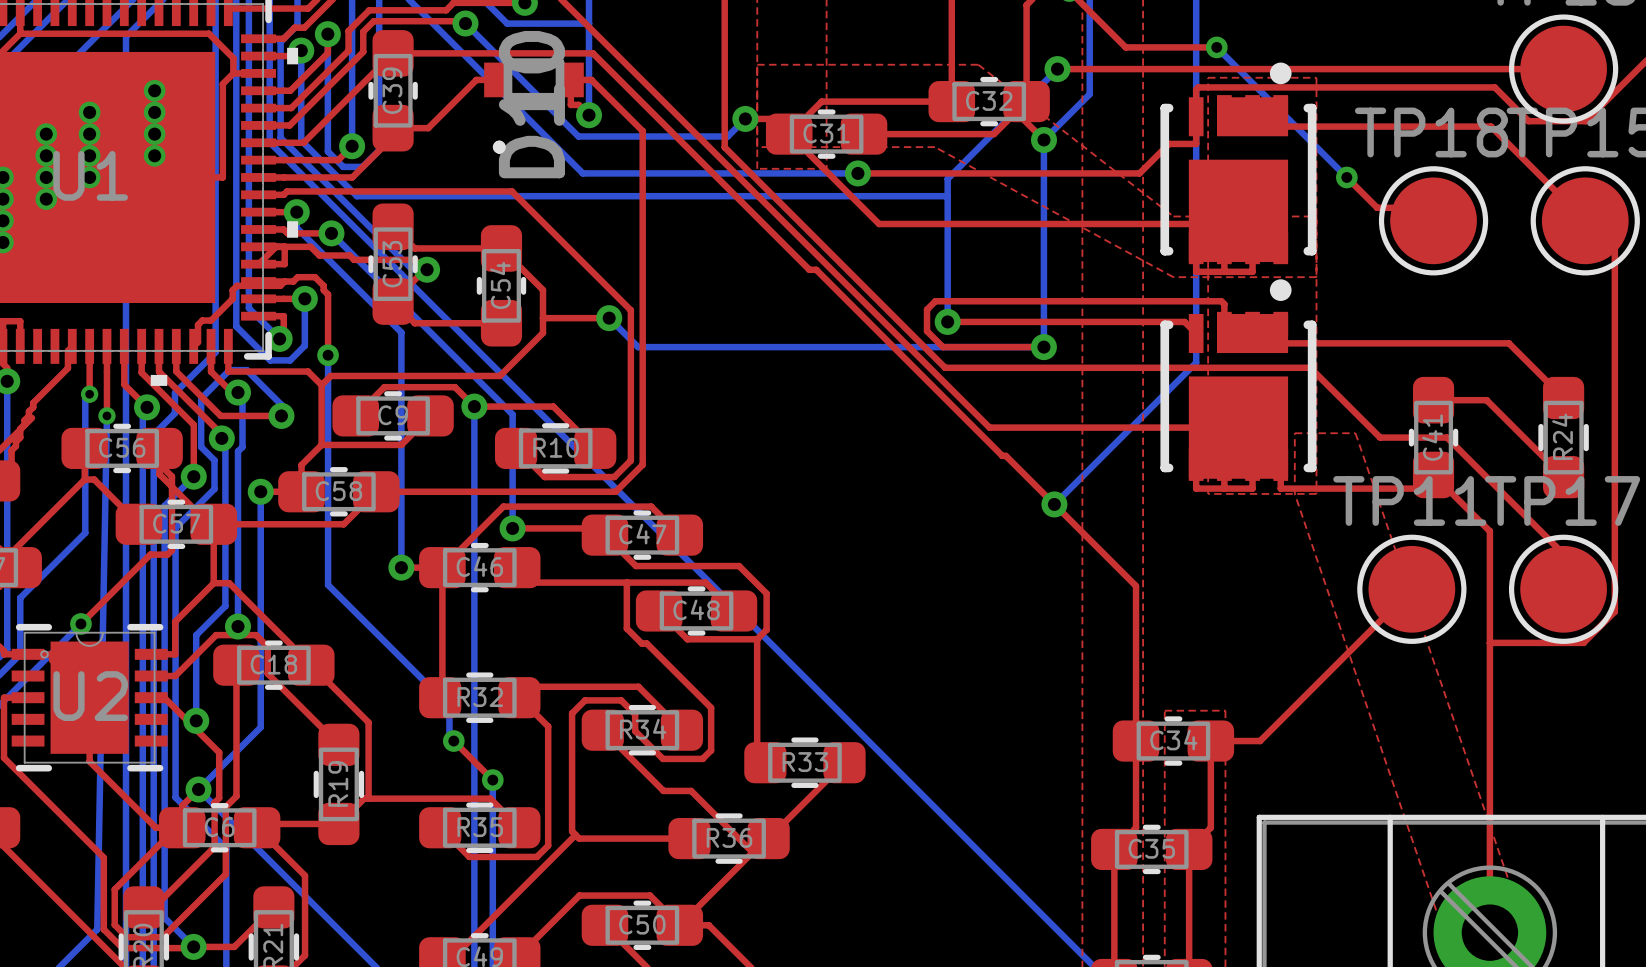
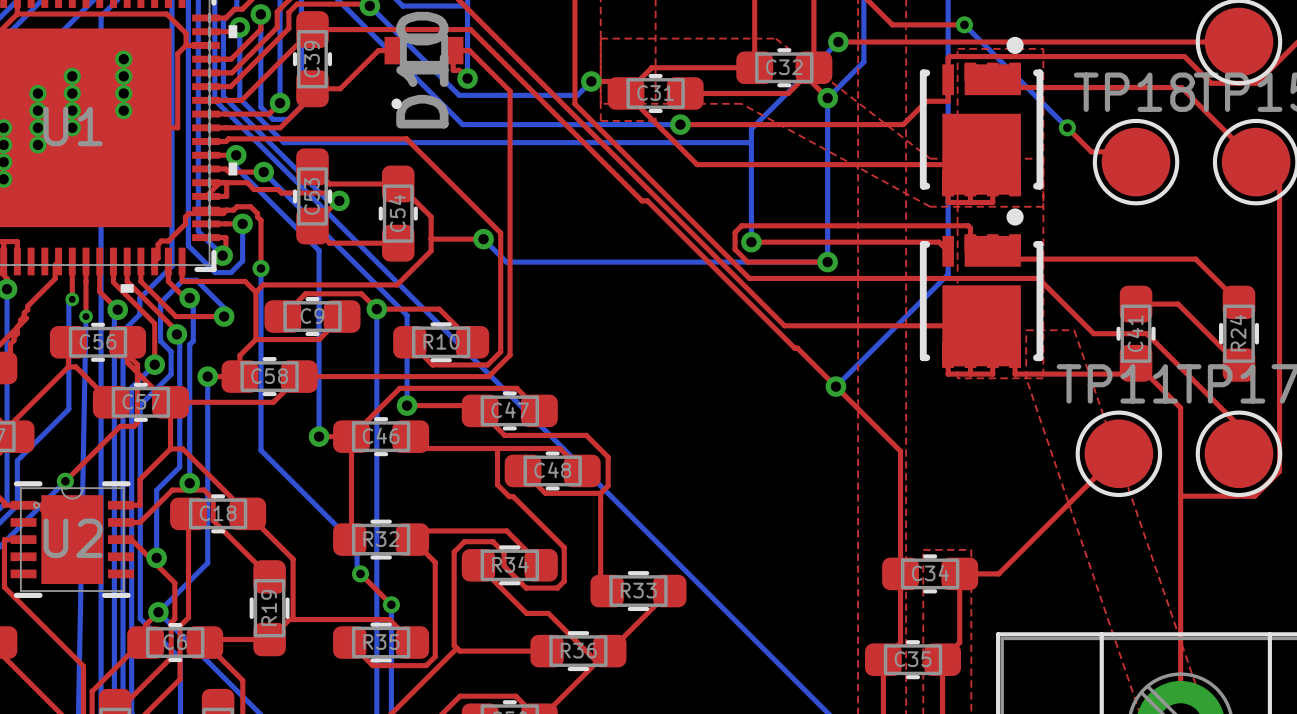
top track: (89, 697) (89, 761) (155, 827) (176, 827) -> none

